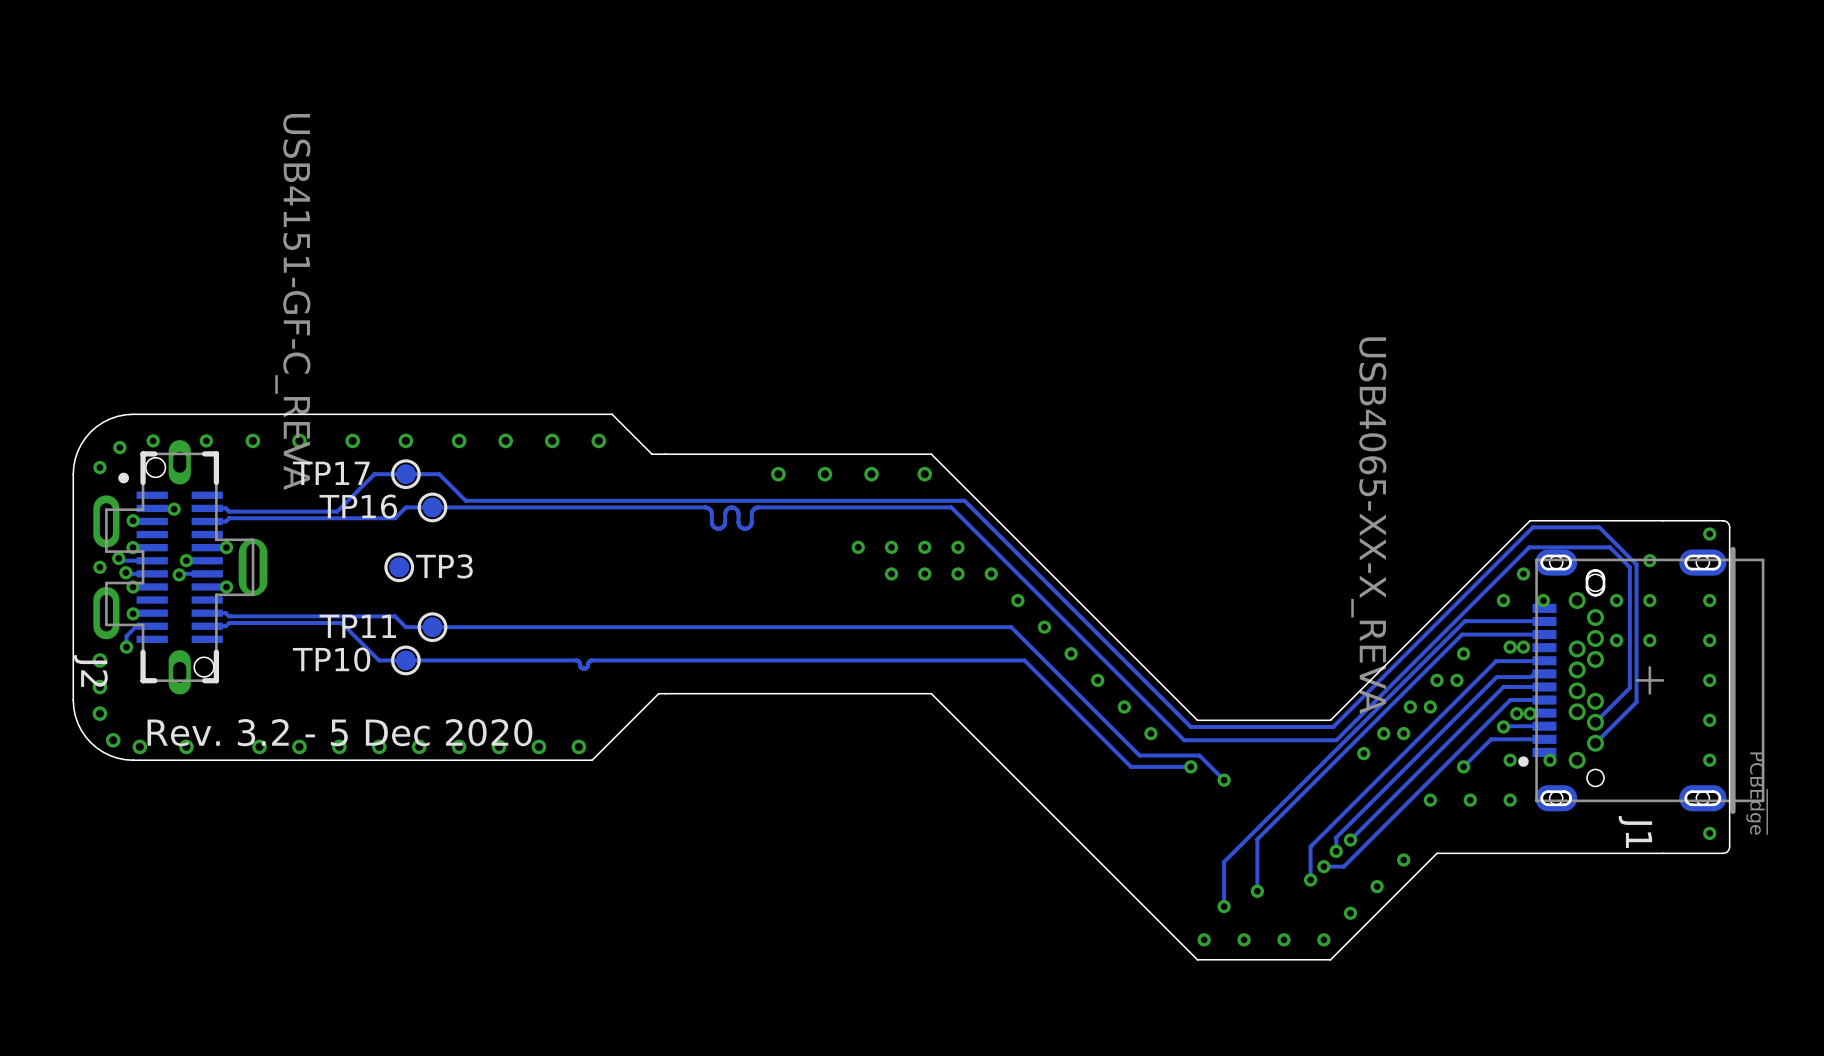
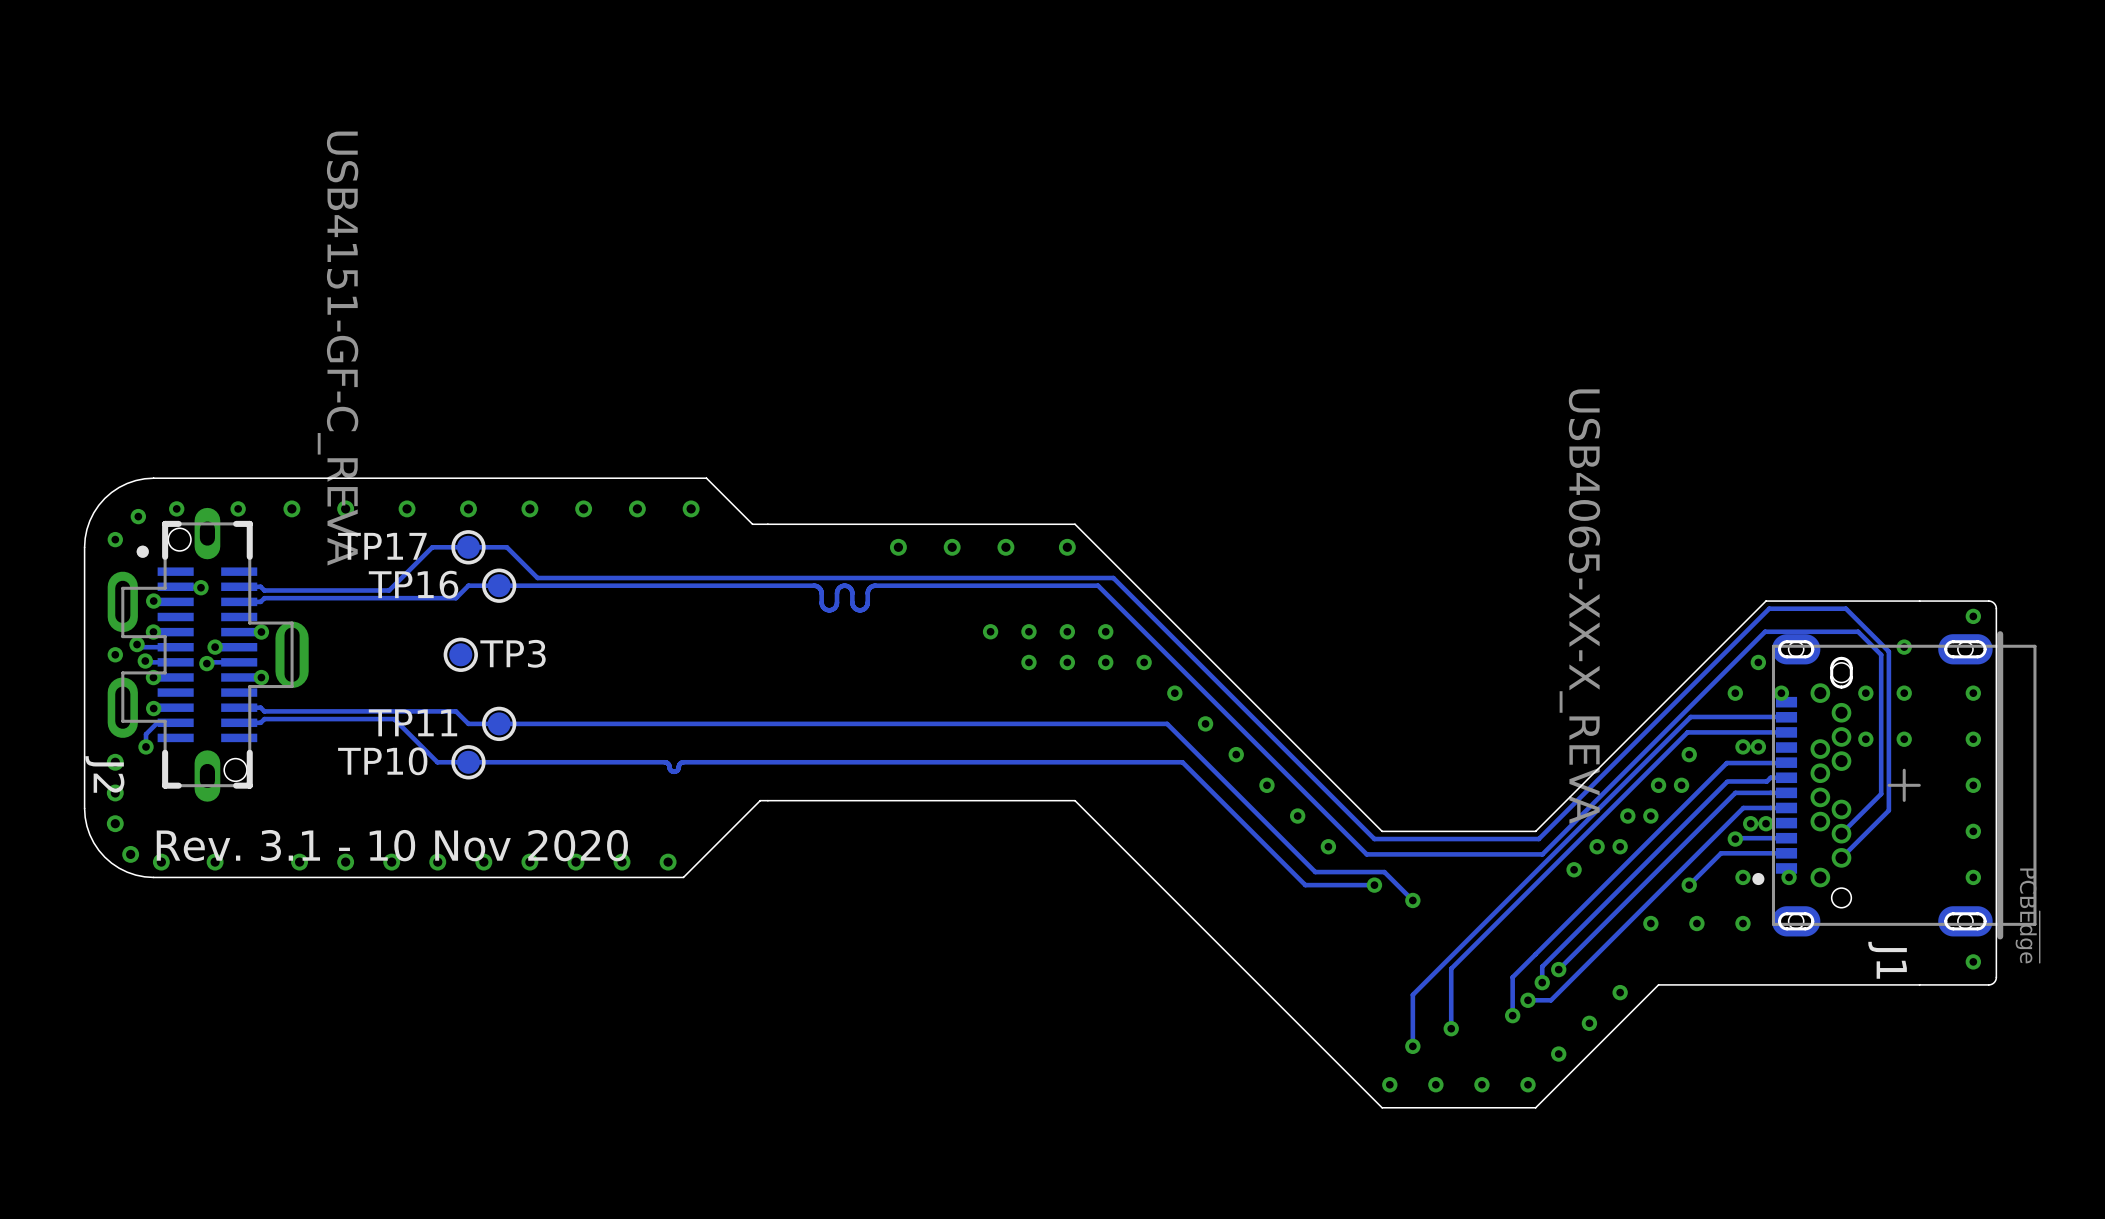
J1 footprint: [1518, 546, 1765, 814] -> [1752, 631, 2037, 940]
text: Rev. 3.2 - 5 Dec 2020 (339, 732) -> Rev. 3.1 - 10 Nov 2020 (392, 845)

